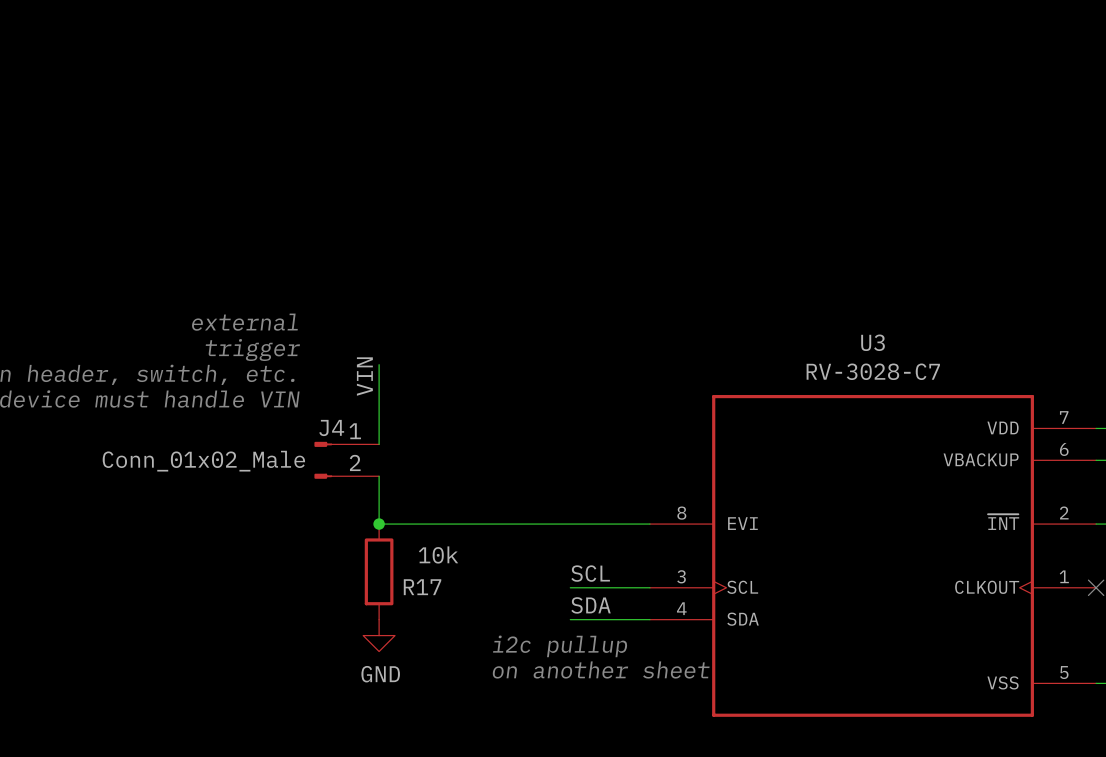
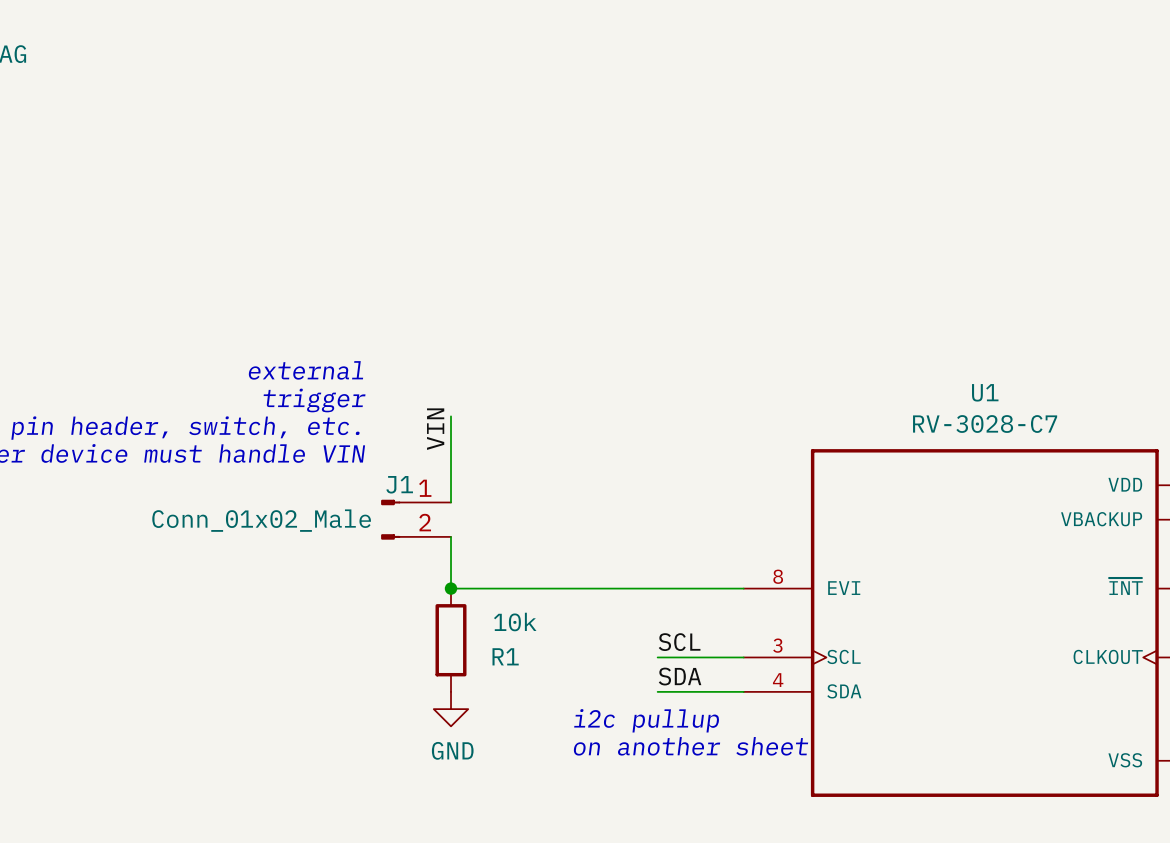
U3 name: U3 (873, 342) -> U1 (985, 392)
J4 name: J4 (331, 427) -> J1 (399, 484)
R17 name: R17 (422, 587) -> R1 (505, 656)

